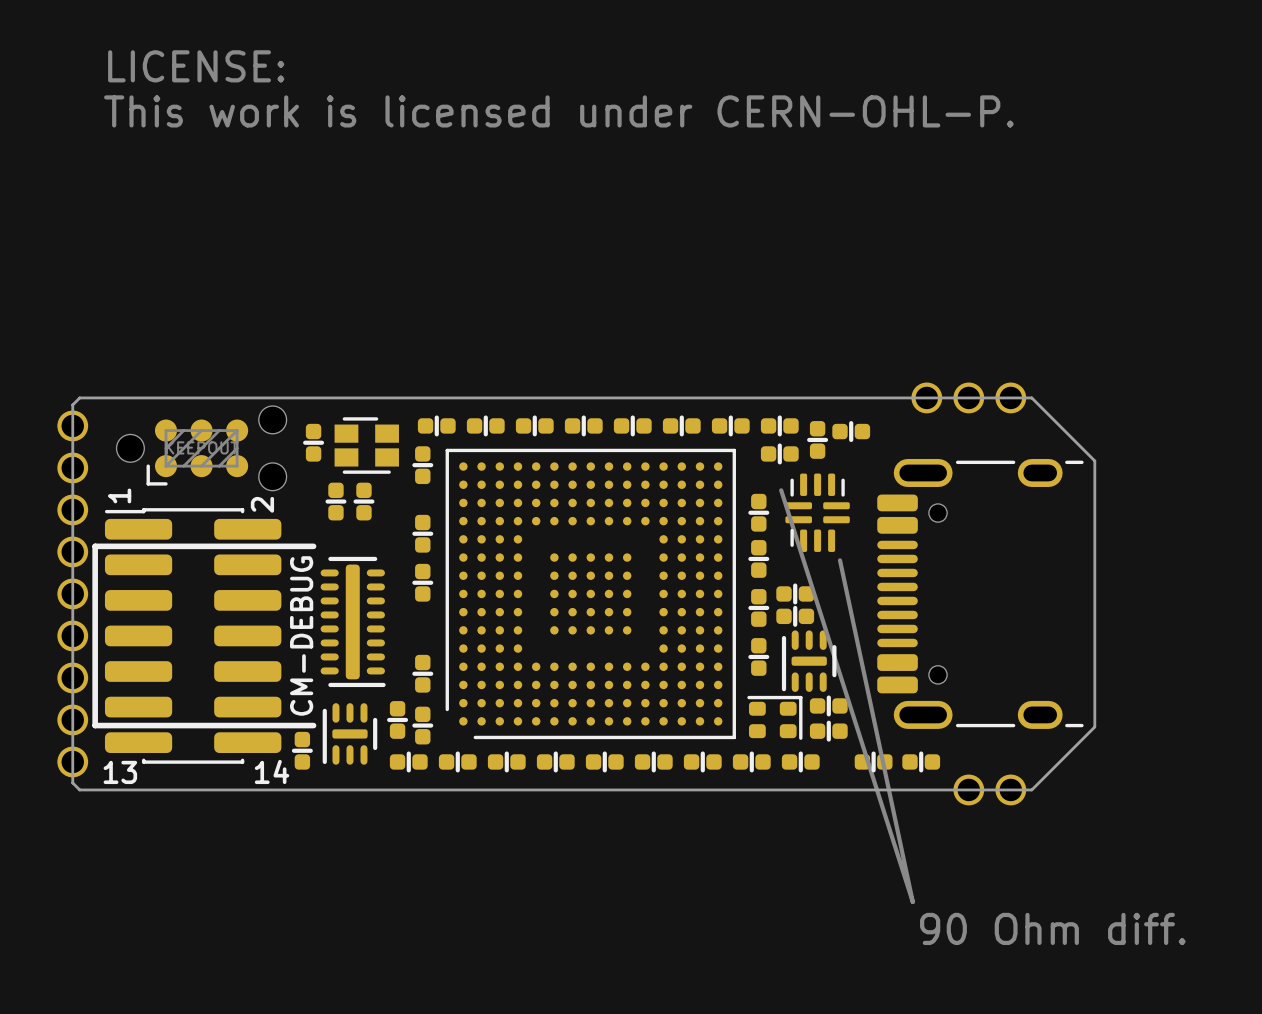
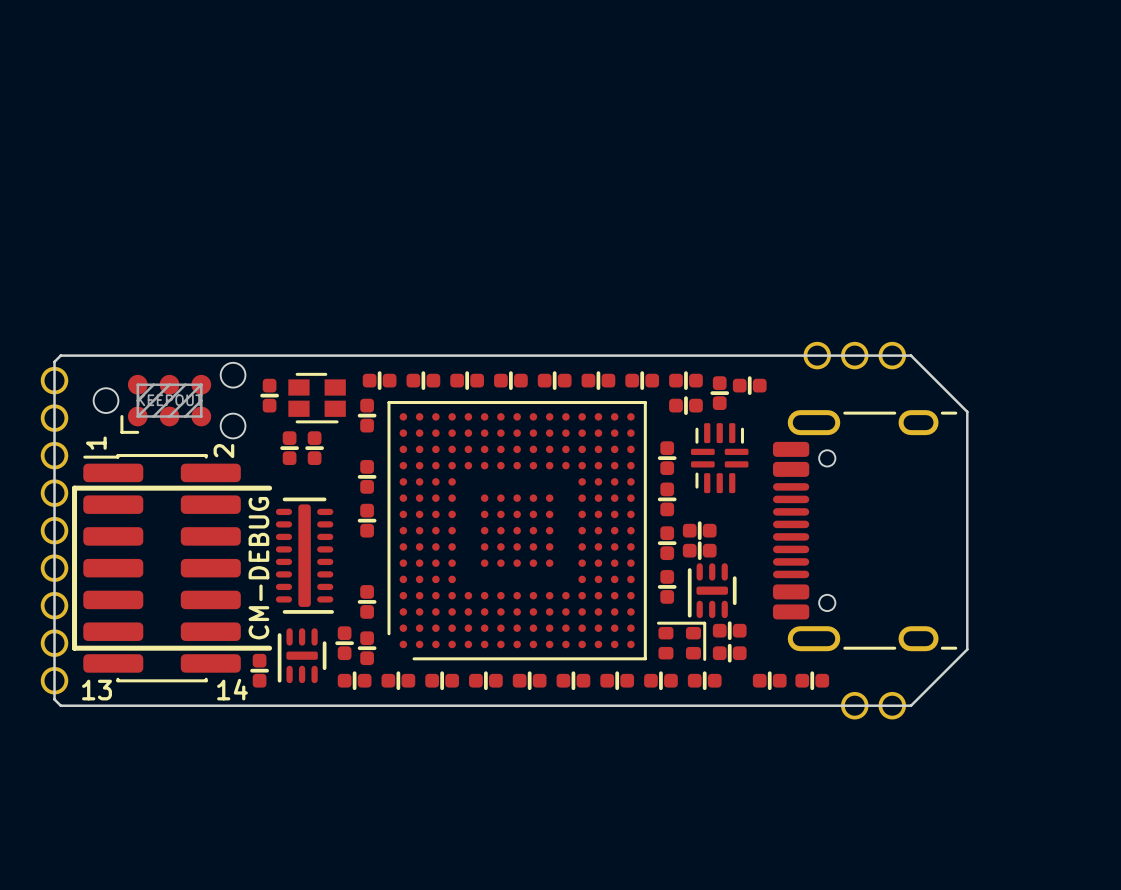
text: LICENSE: (196, 66) -> none
text: This work is licensed under CERN-OHL-P. (558, 111) -> none
line: (781, 490) (912, 901) (840, 560) -> none
text: 90 Ohm diff. (1052, 928) -> none

